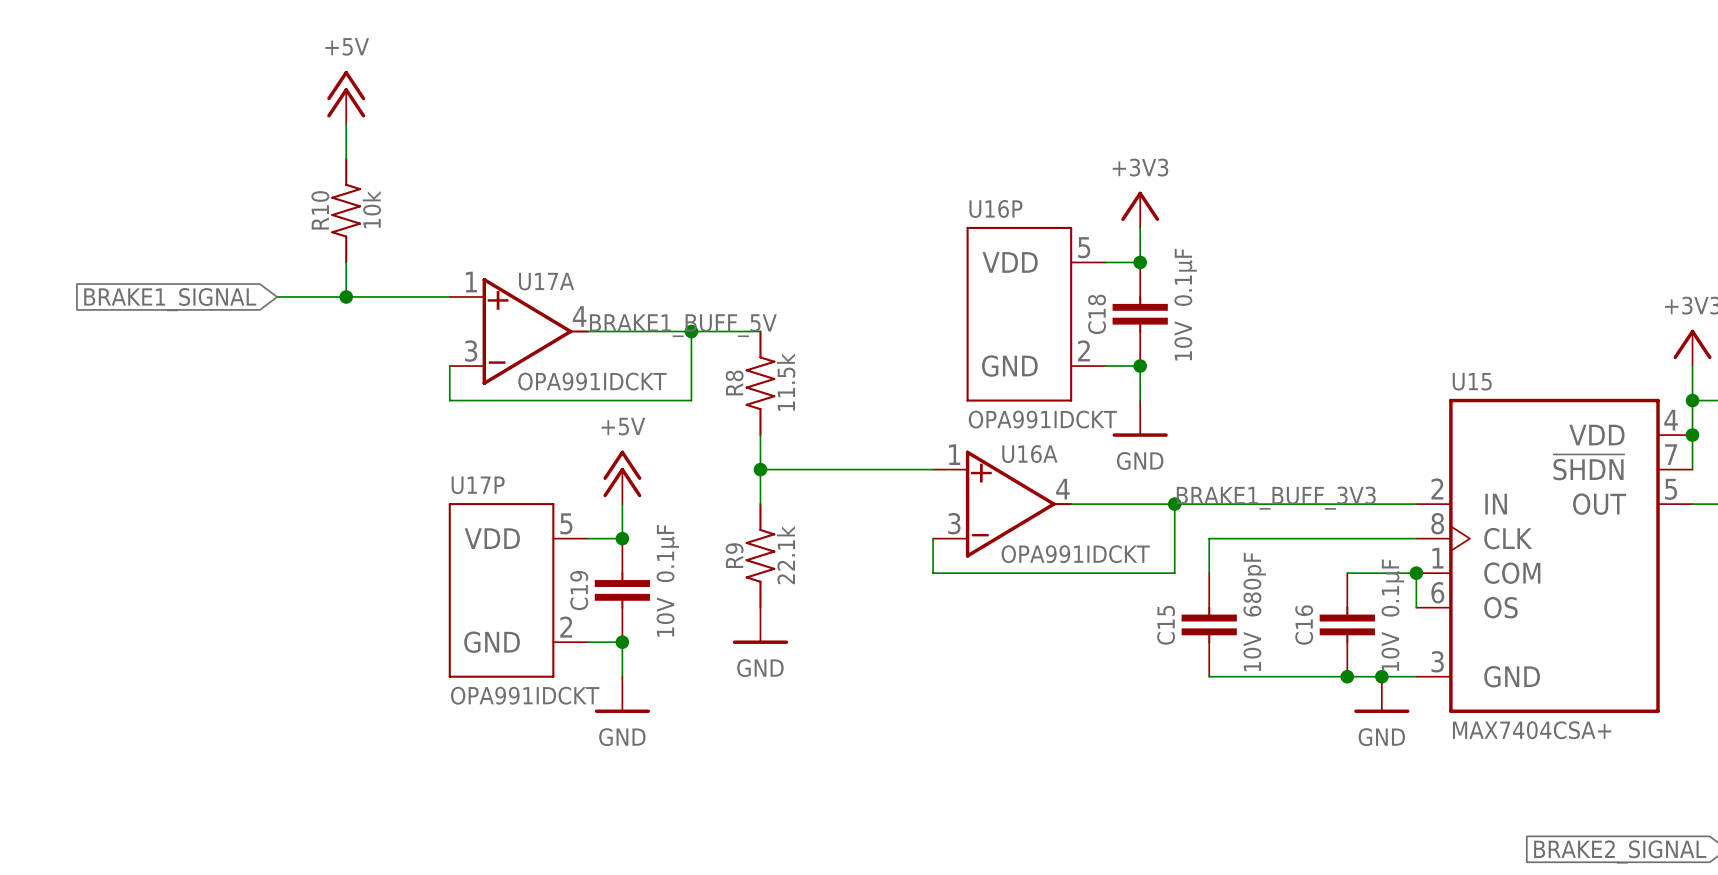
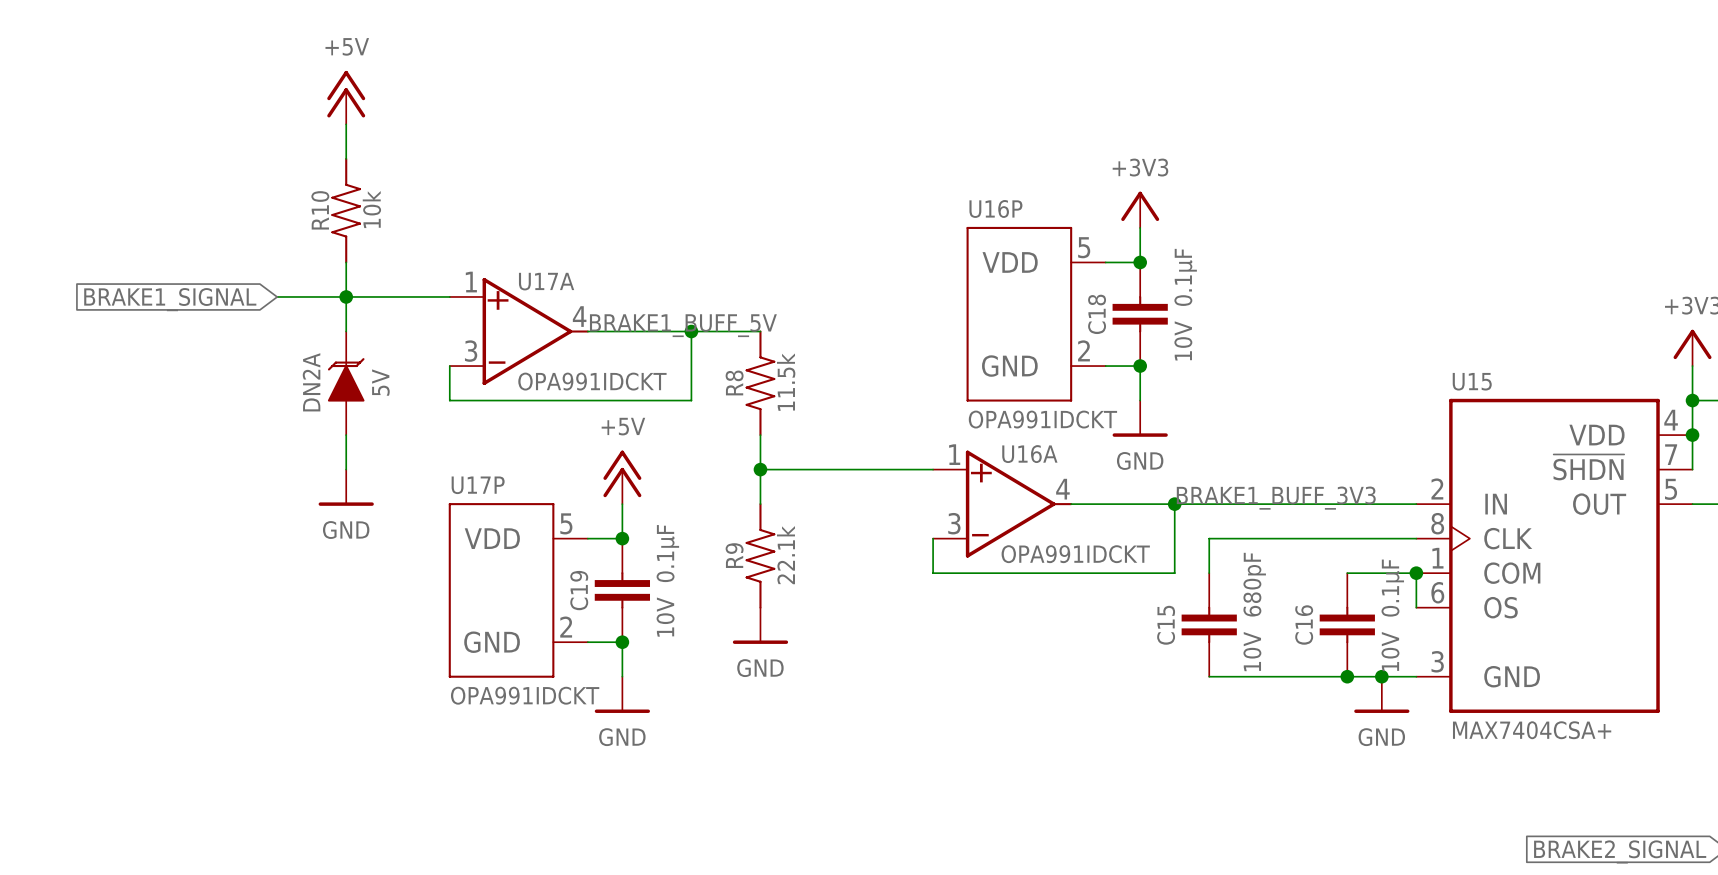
wire: none -> (346, 296) (346, 331)
DN2A: none -> (346, 383)
wire: none -> (346, 435) (346, 469)
power symbol: none -> GND (346, 487)

